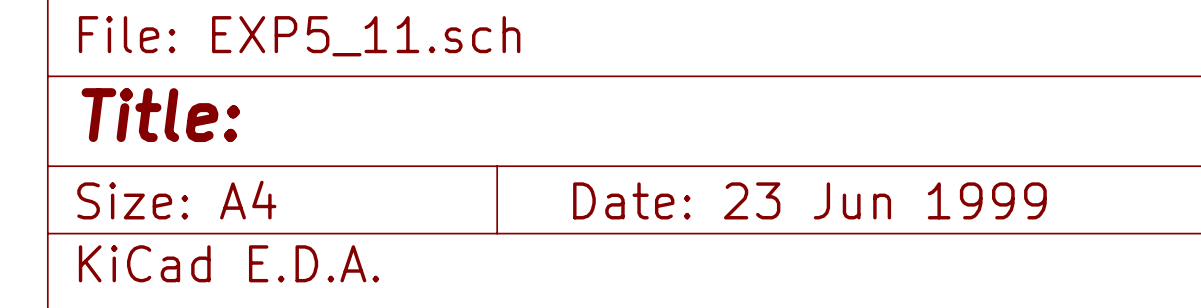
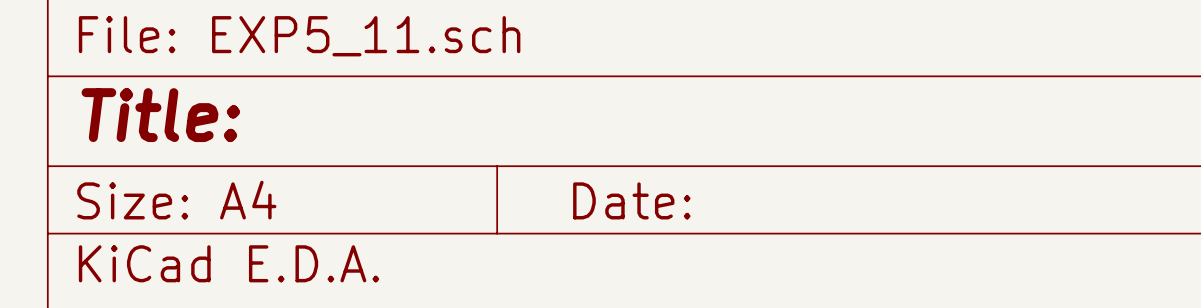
title block: Date: 23 Jun 1999 (809, 200) -> Date: (631, 200)

